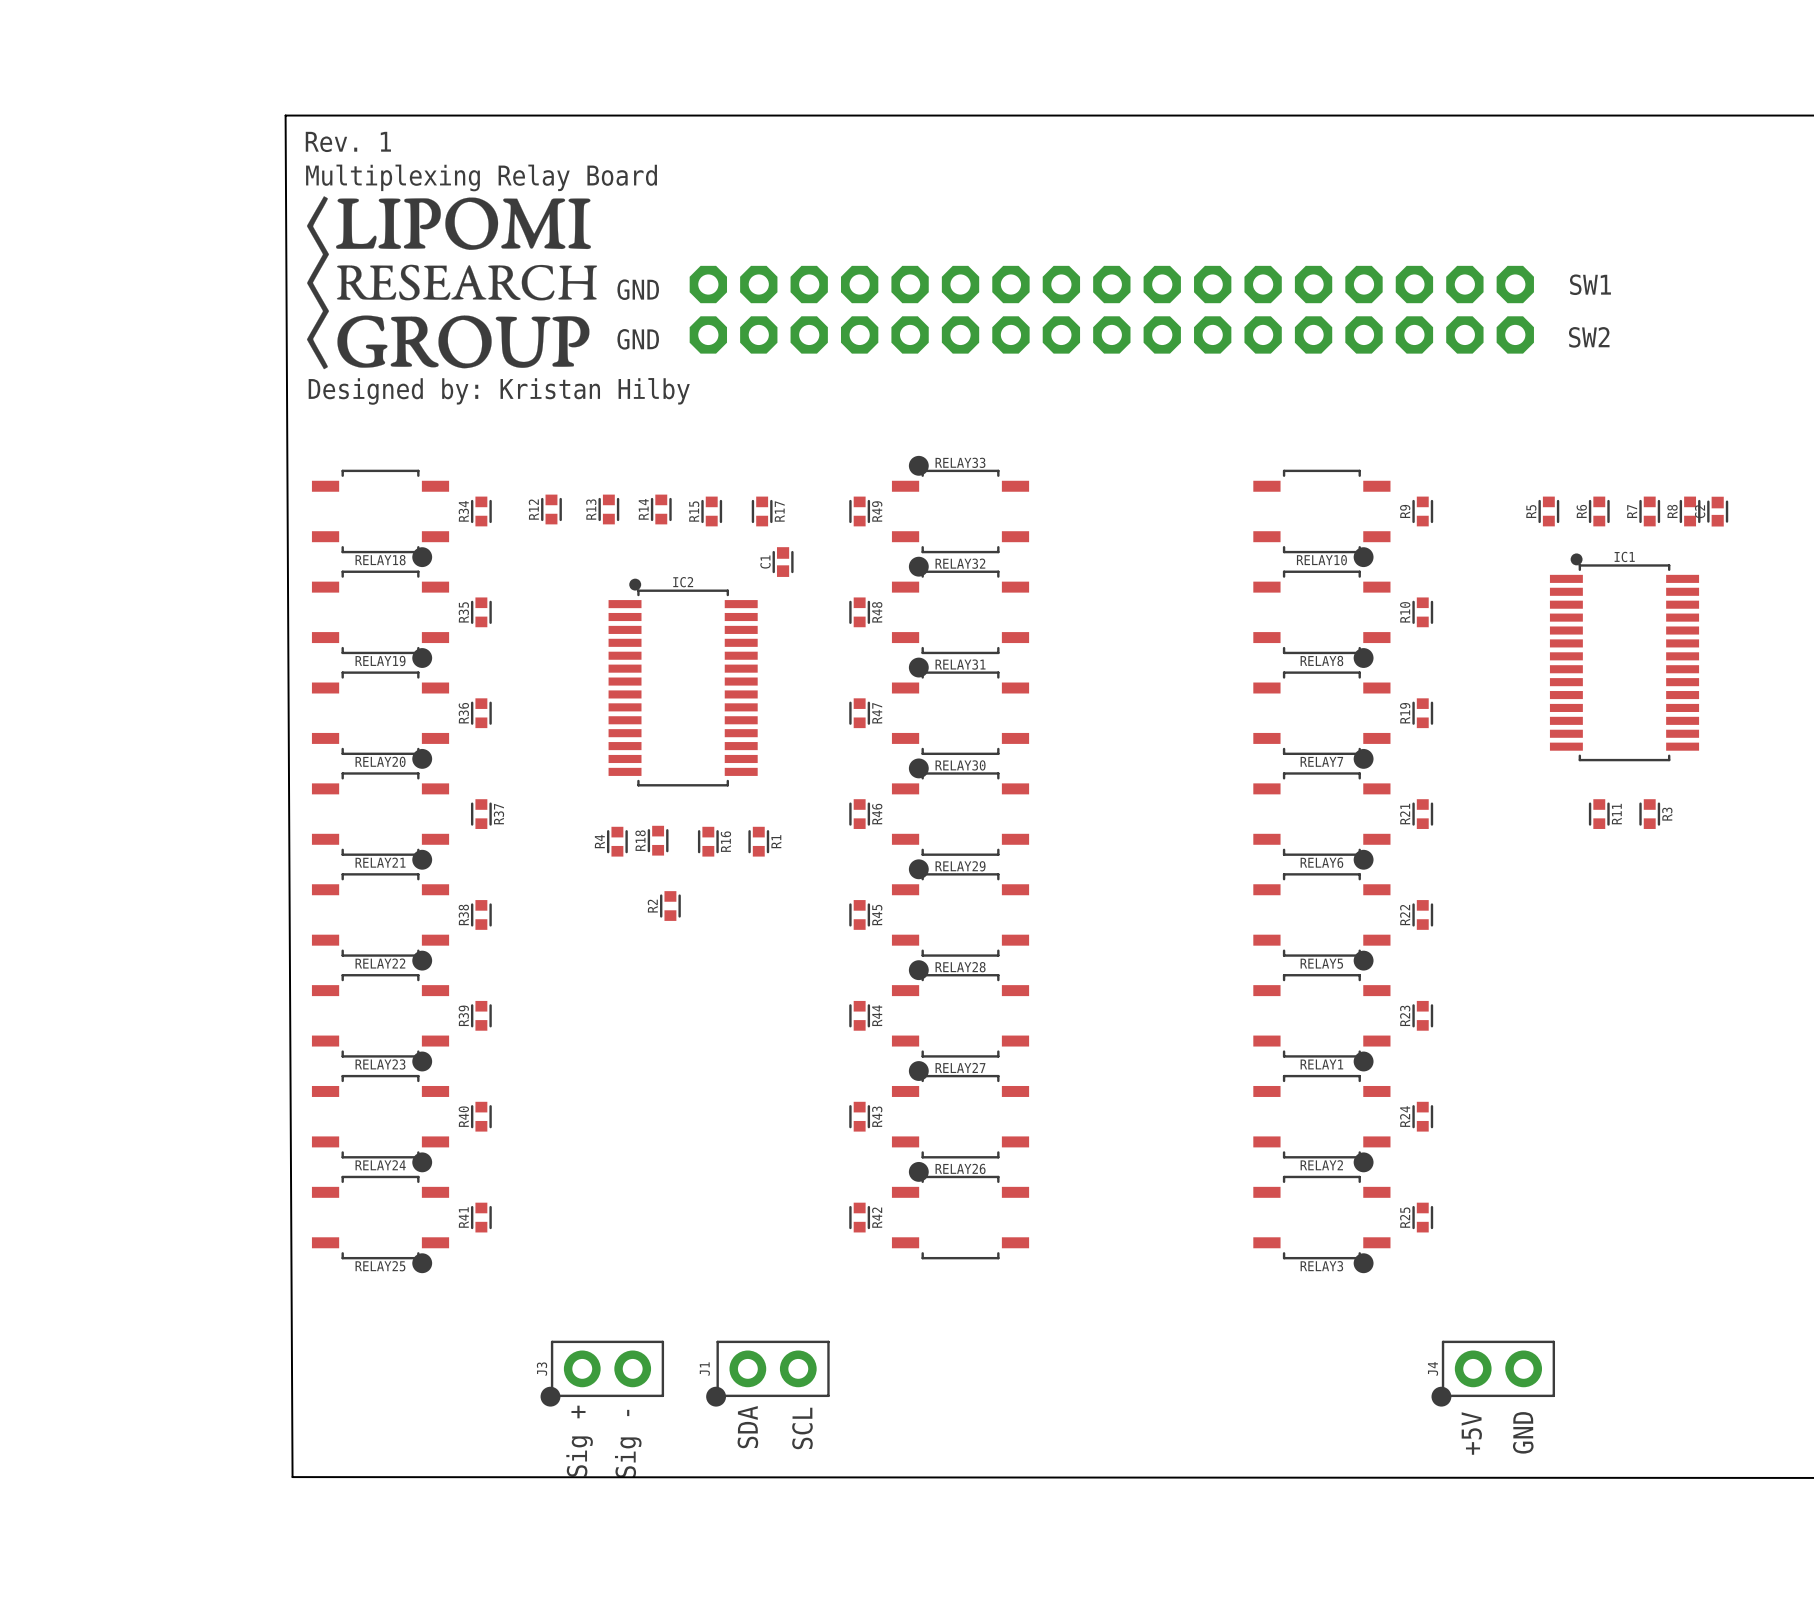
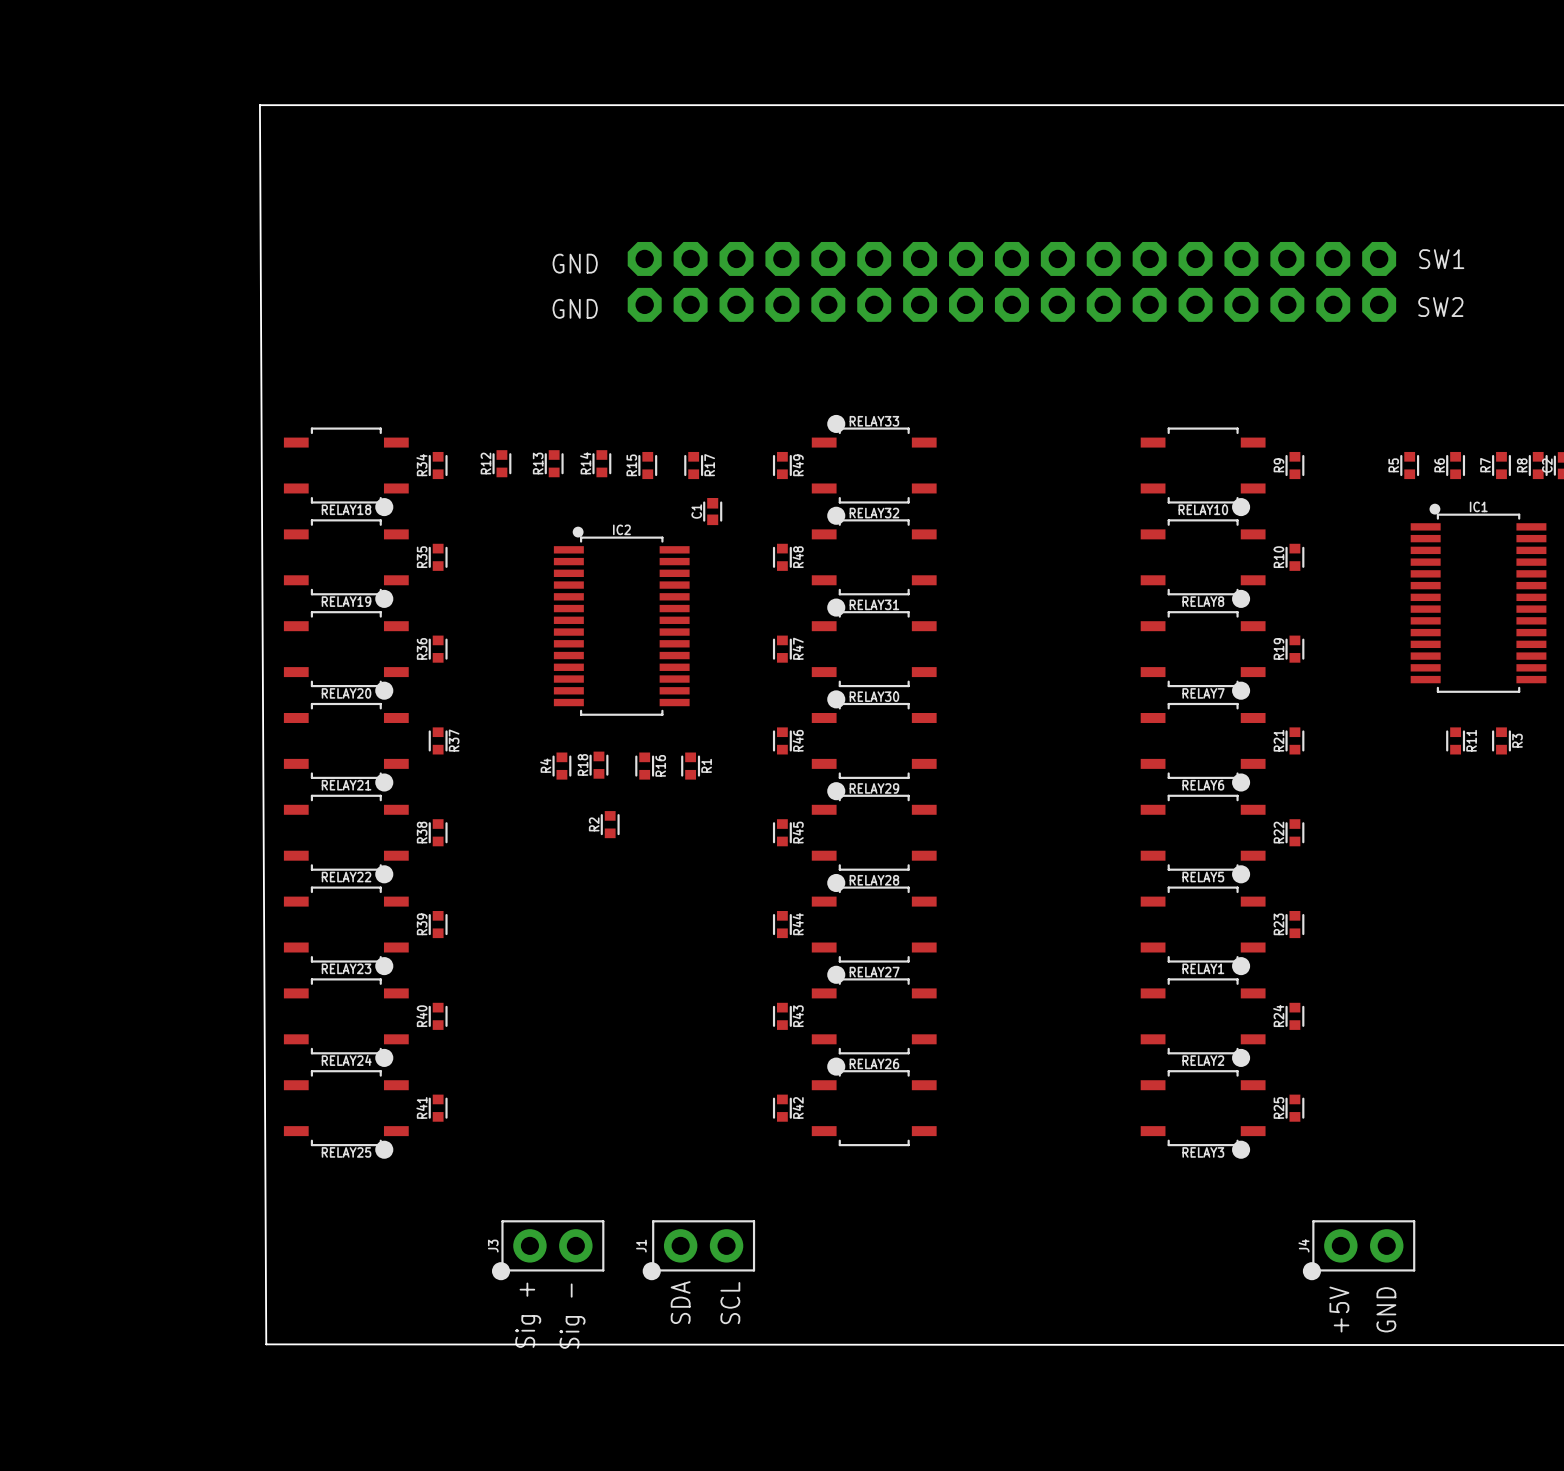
text: Rev. 1 (348, 141) -> none
text: Multiplexing Relay Board (481, 177) -> none
drawing: [306, 196, 598, 370] -> none
text: Designed by: Kristan Hilby (499, 391) -> none

